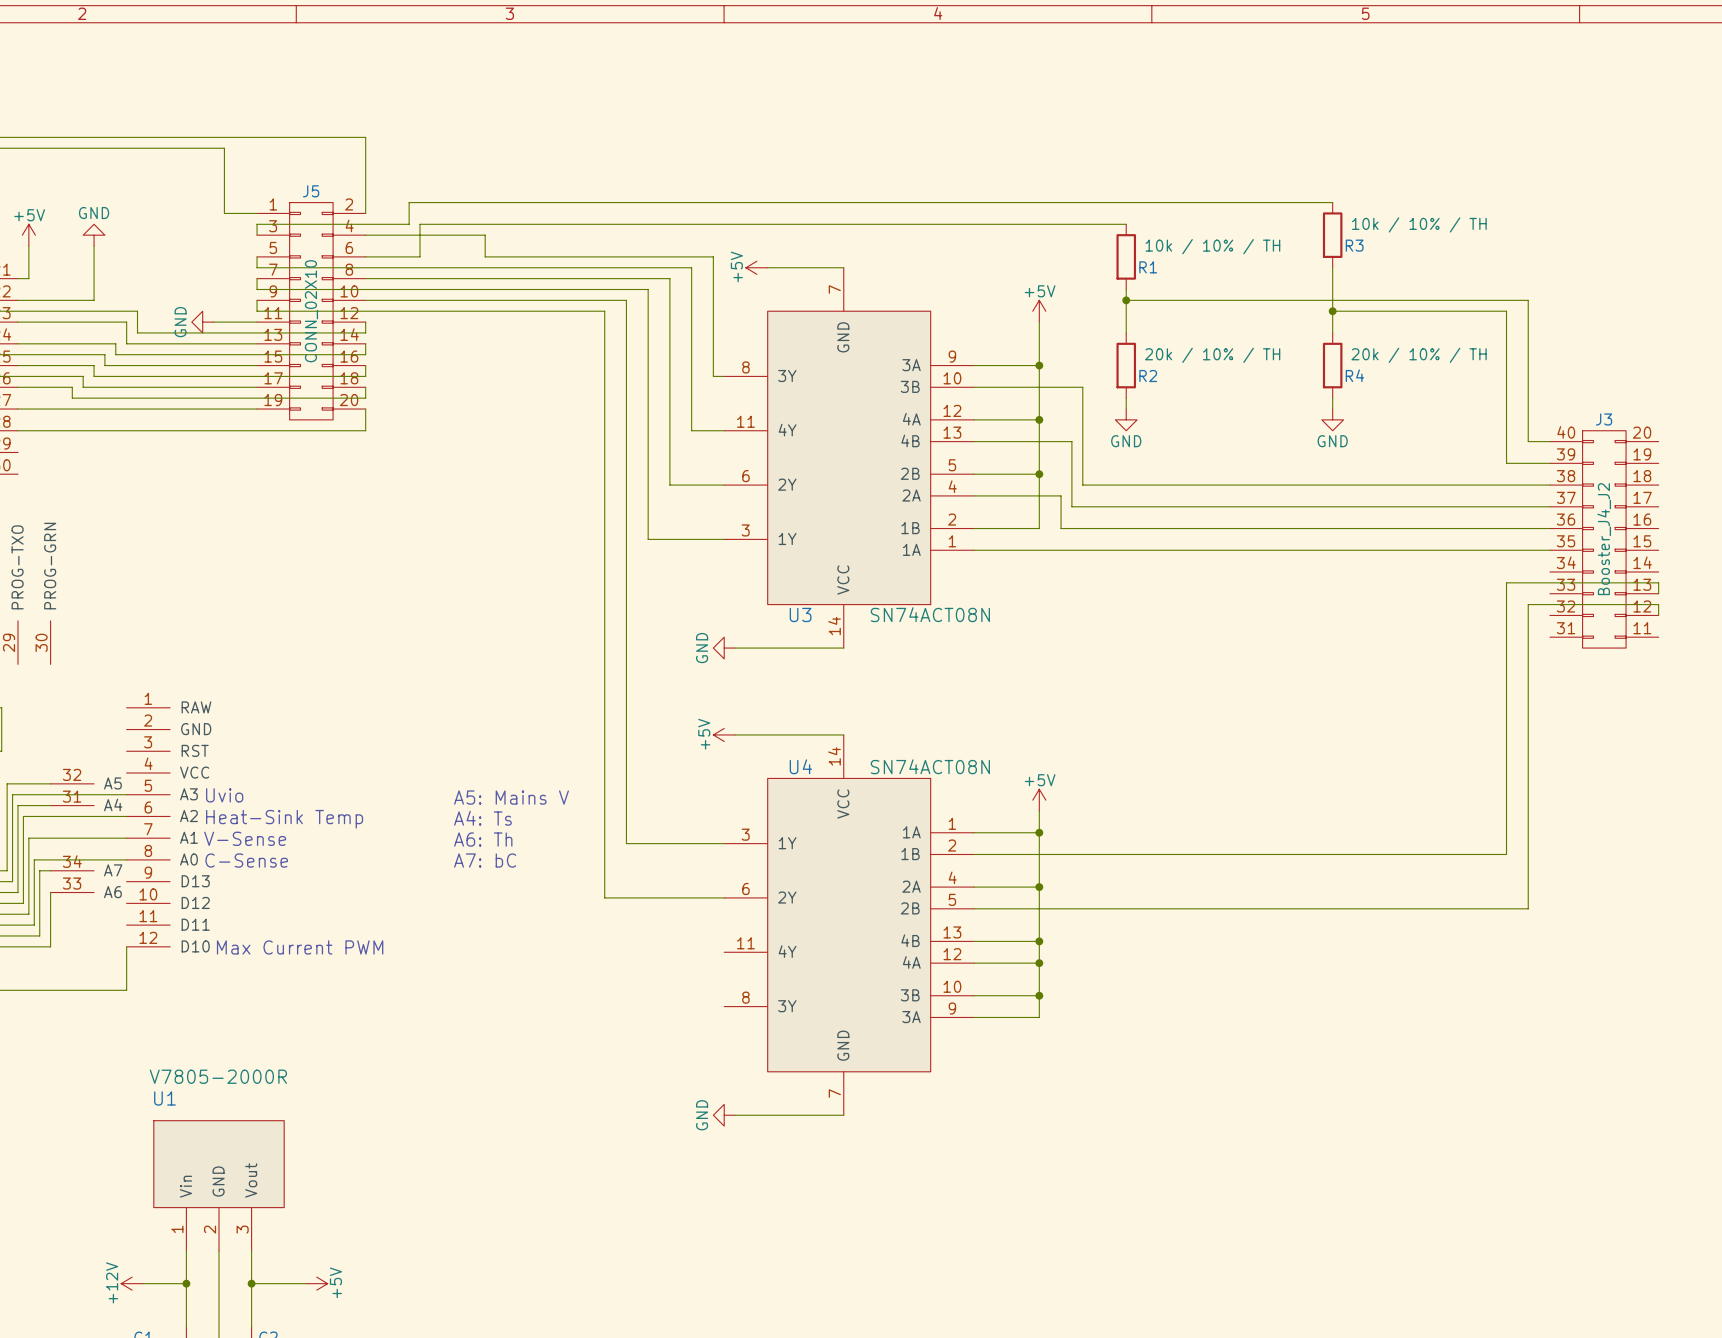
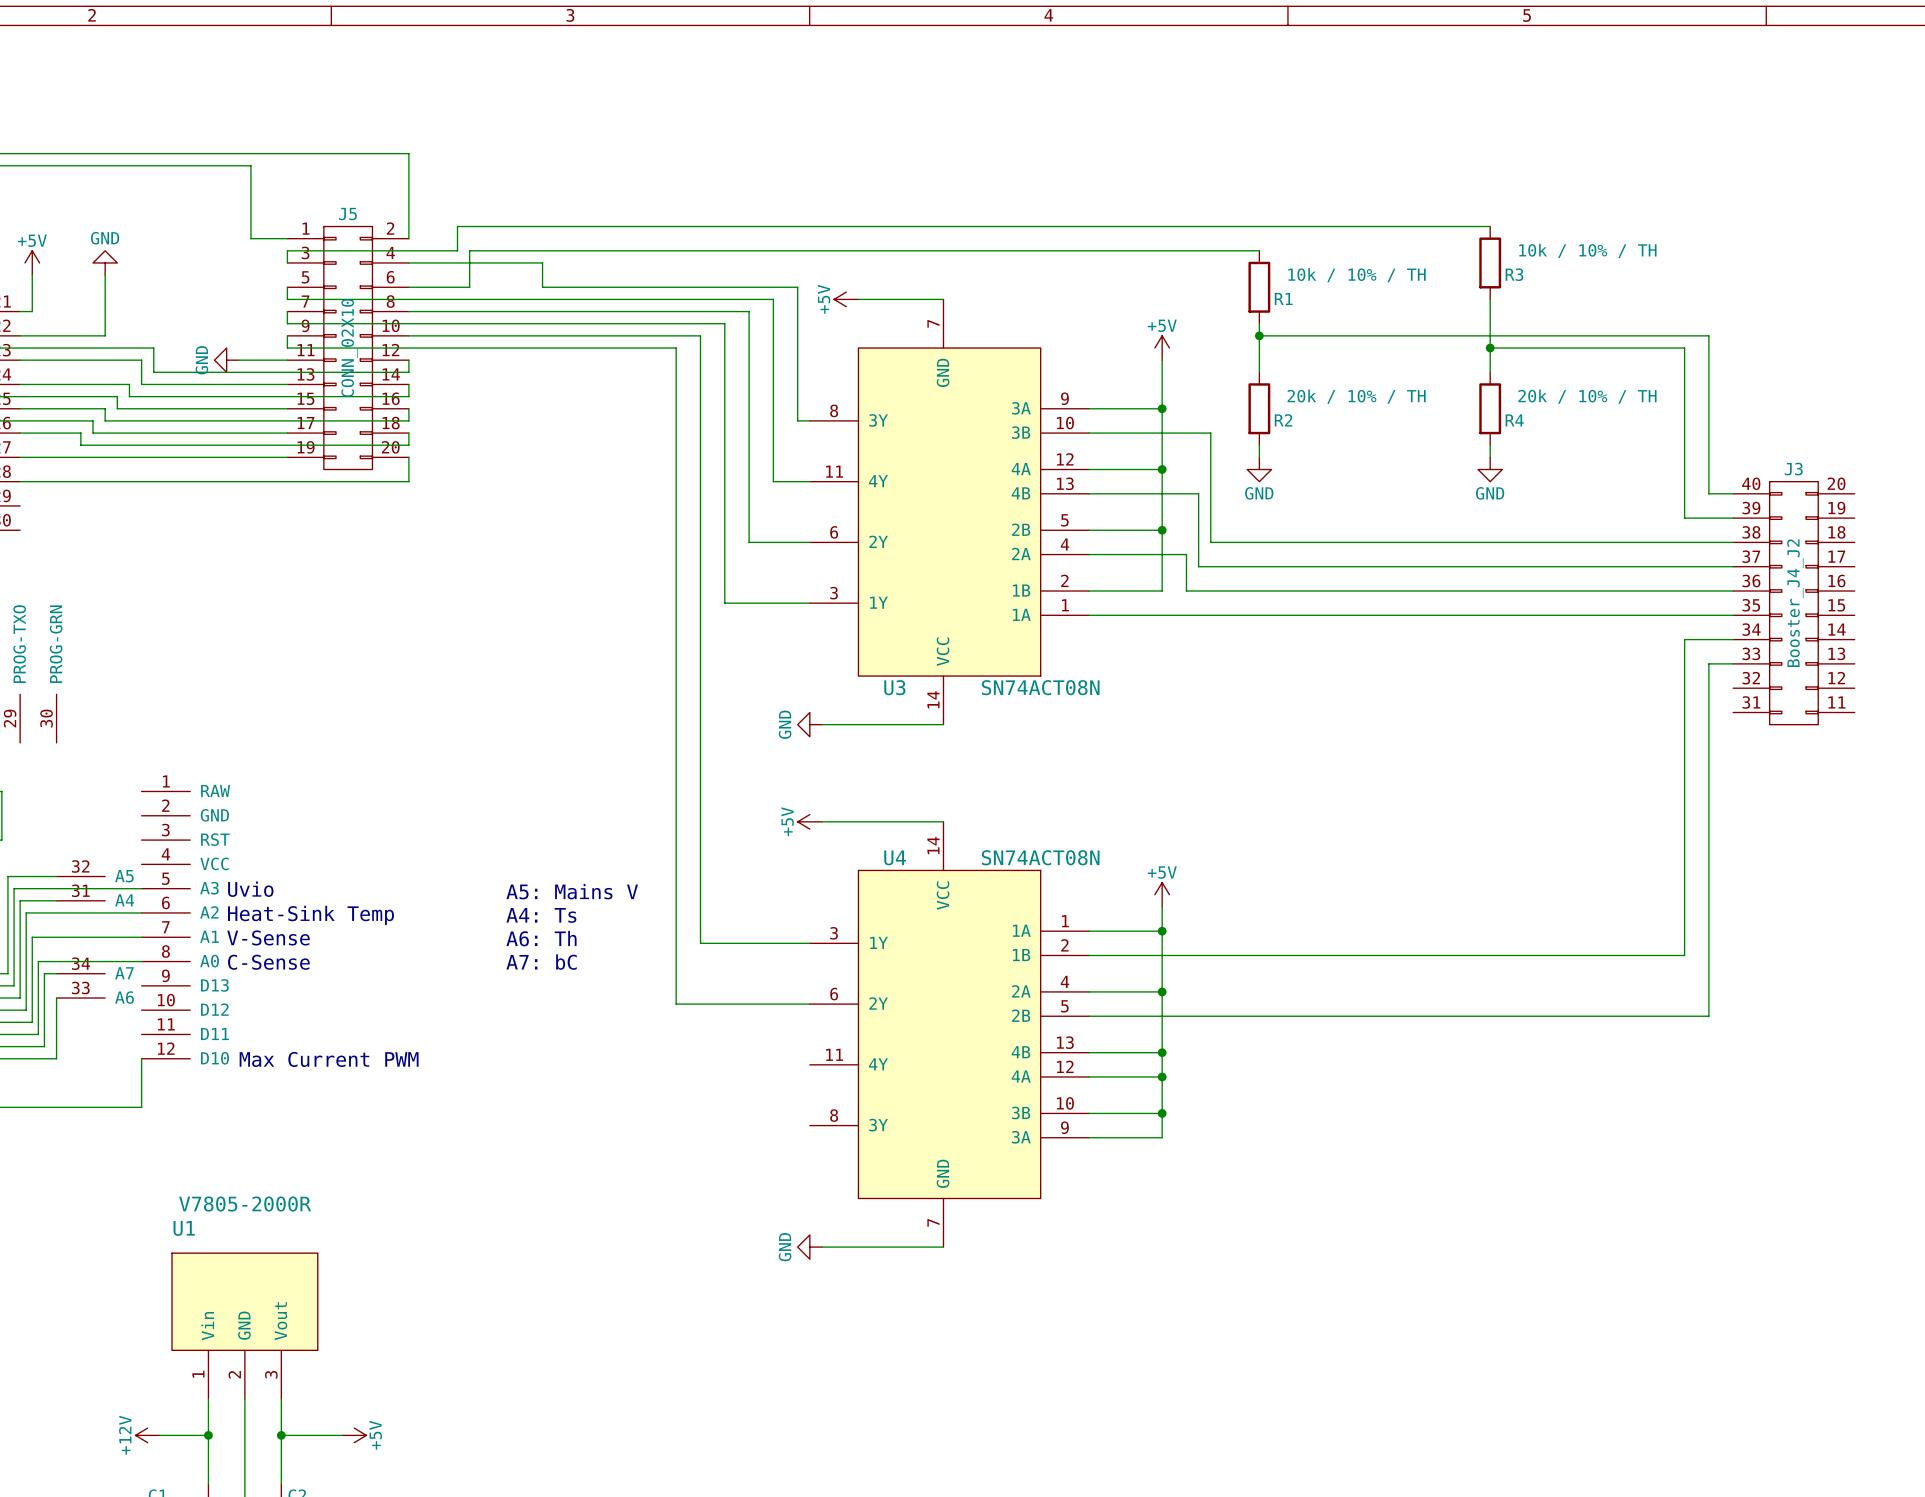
wire: (1506, 582) (1658, 582) (1658, 593) -> (1684, 651) (1684, 639) (1733, 639)
wire: (1528, 604) (1658, 604) (1658, 615) -> (1708, 676) (1708, 663) (1733, 663)

